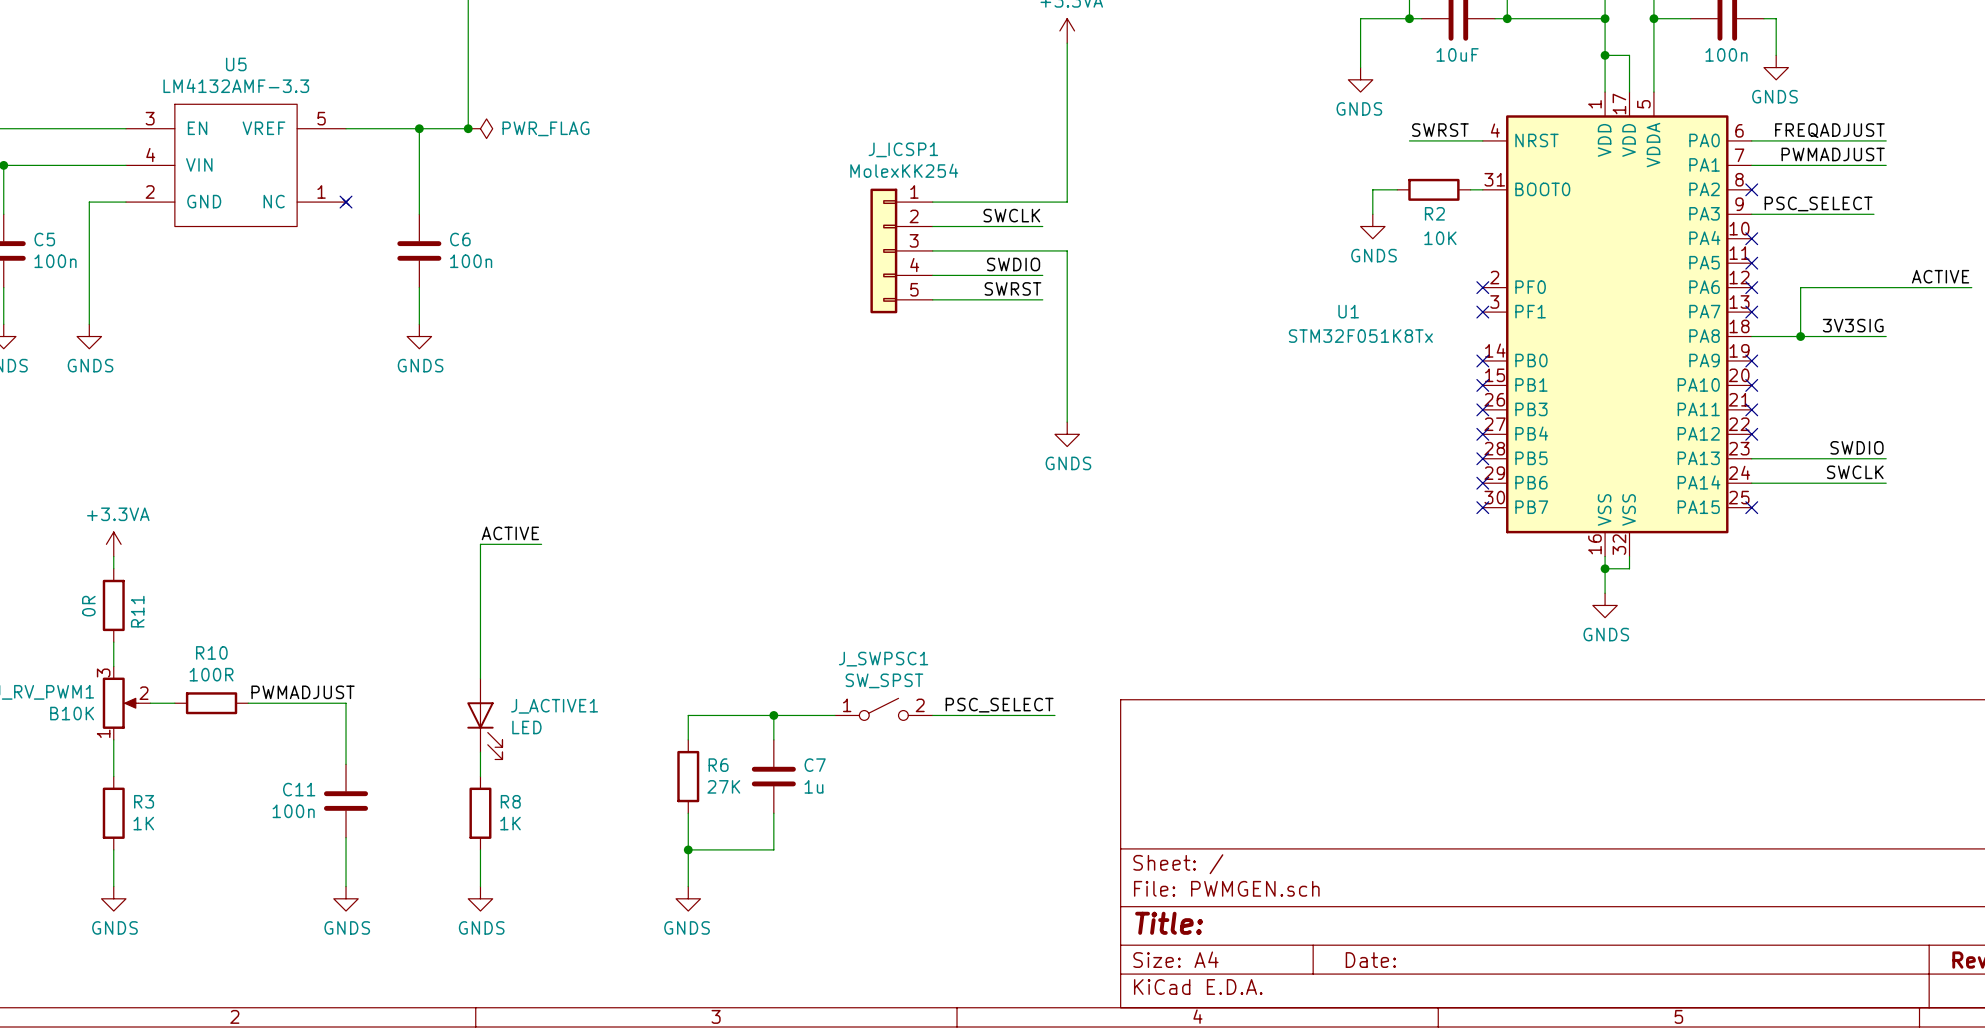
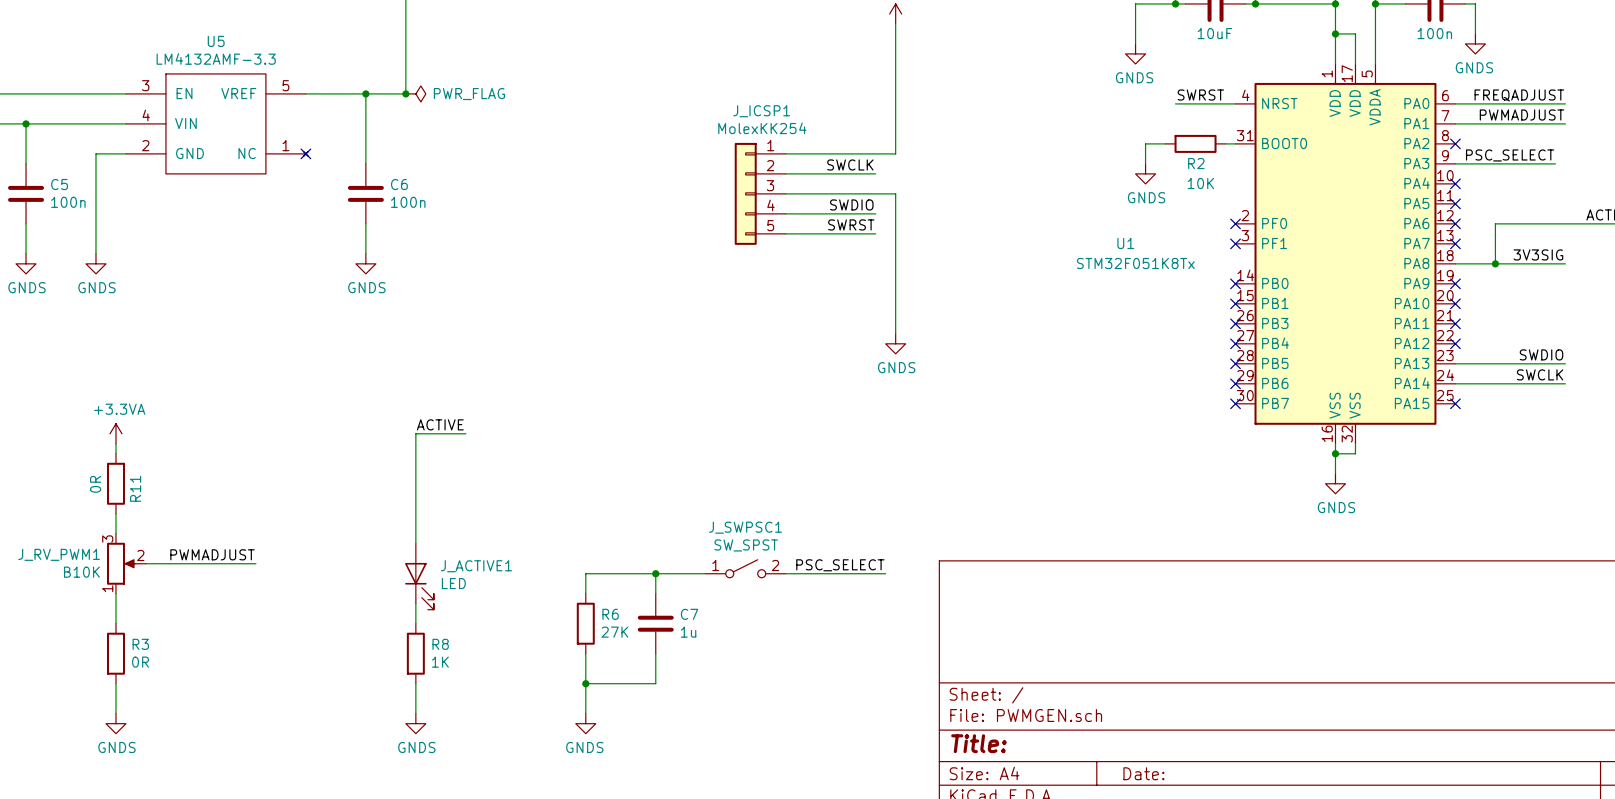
label position: PWMADJUST (303, 692) -> PWMADJUST (212, 554)
wire: none -> (165, 563) (225, 563)
R10: 100R (211, 703) -> none
wire: (284, 703) (346, 703) (346, 764) -> none
C11: 100n (346, 801) -> none
R3 value: 1K (143, 823) -> 0R (140, 662)
wire: (346, 837) (346, 886) -> none
power symbol: GNDS (346, 898) -> none

